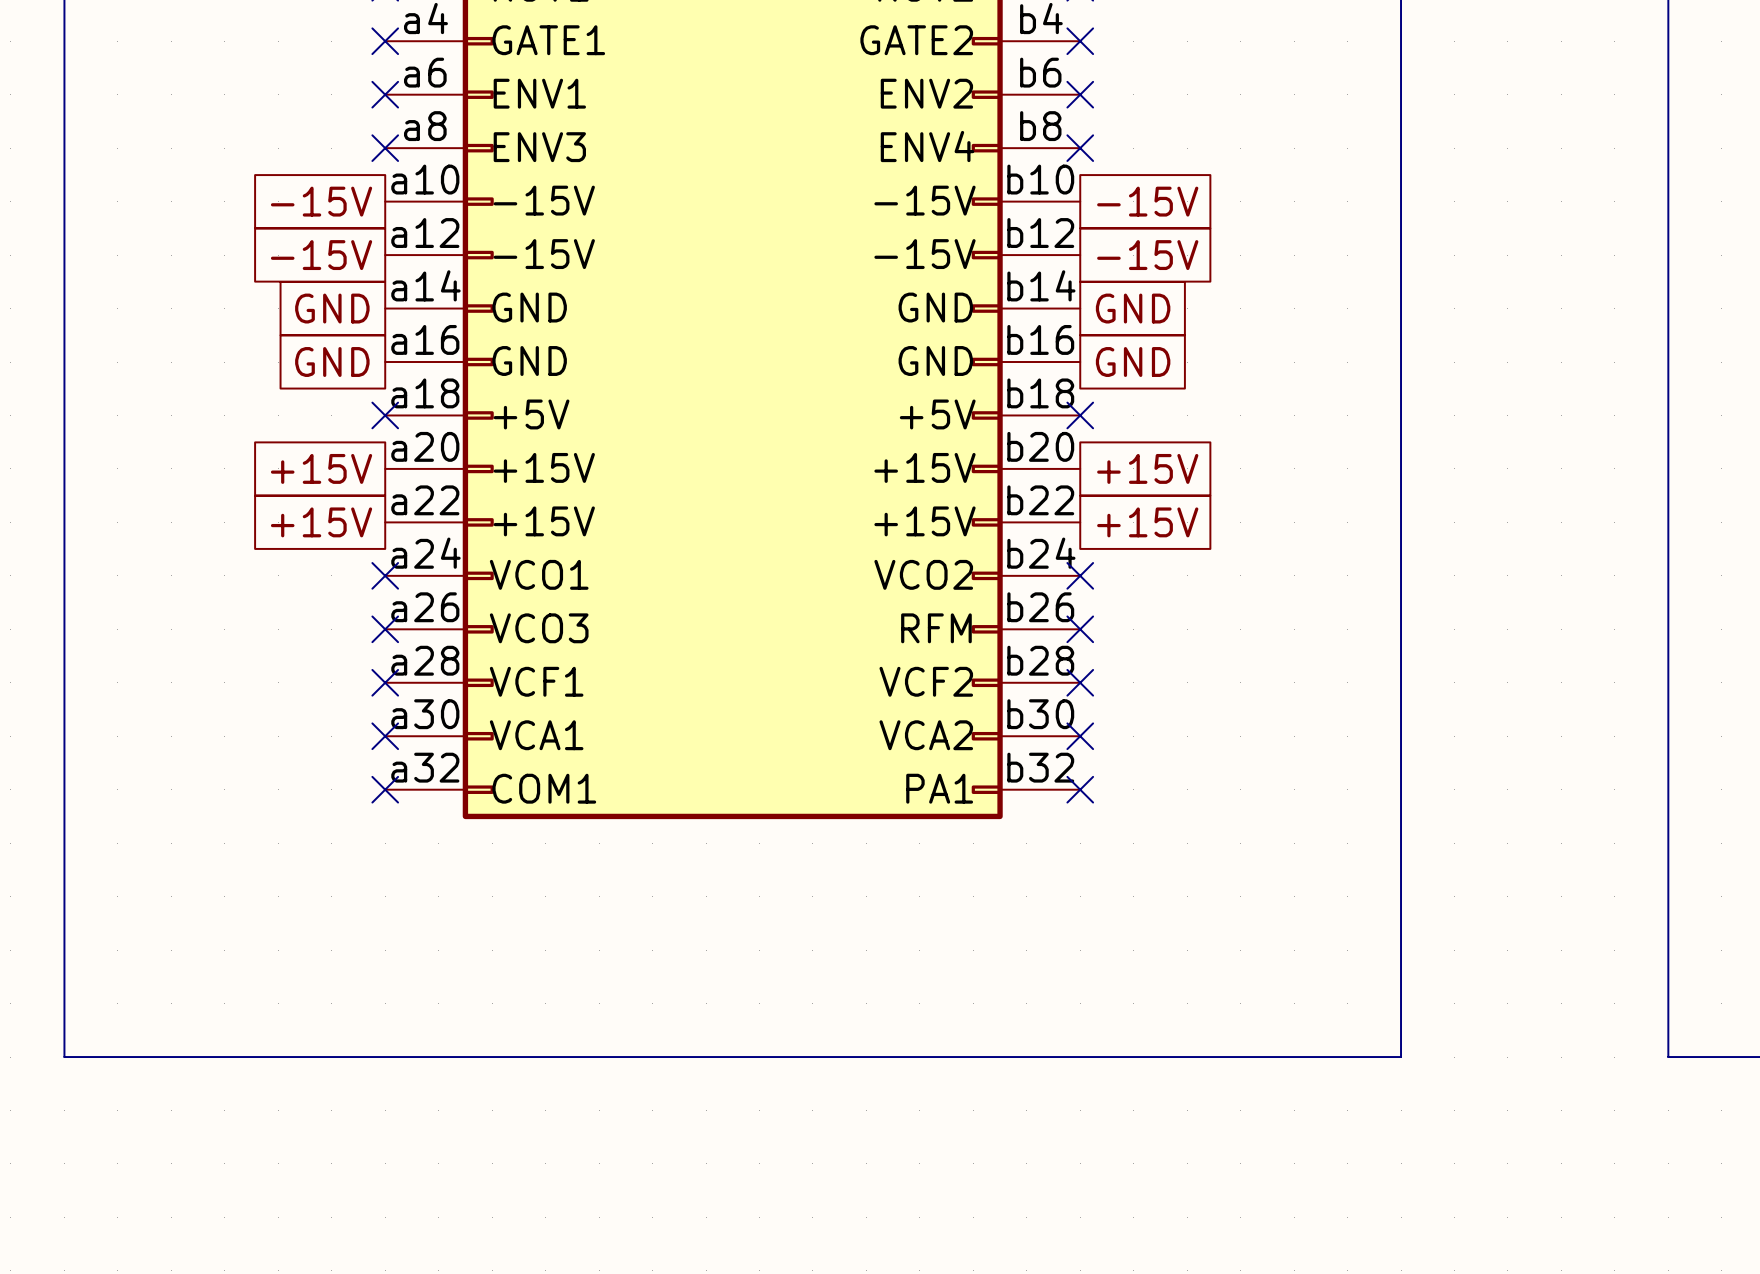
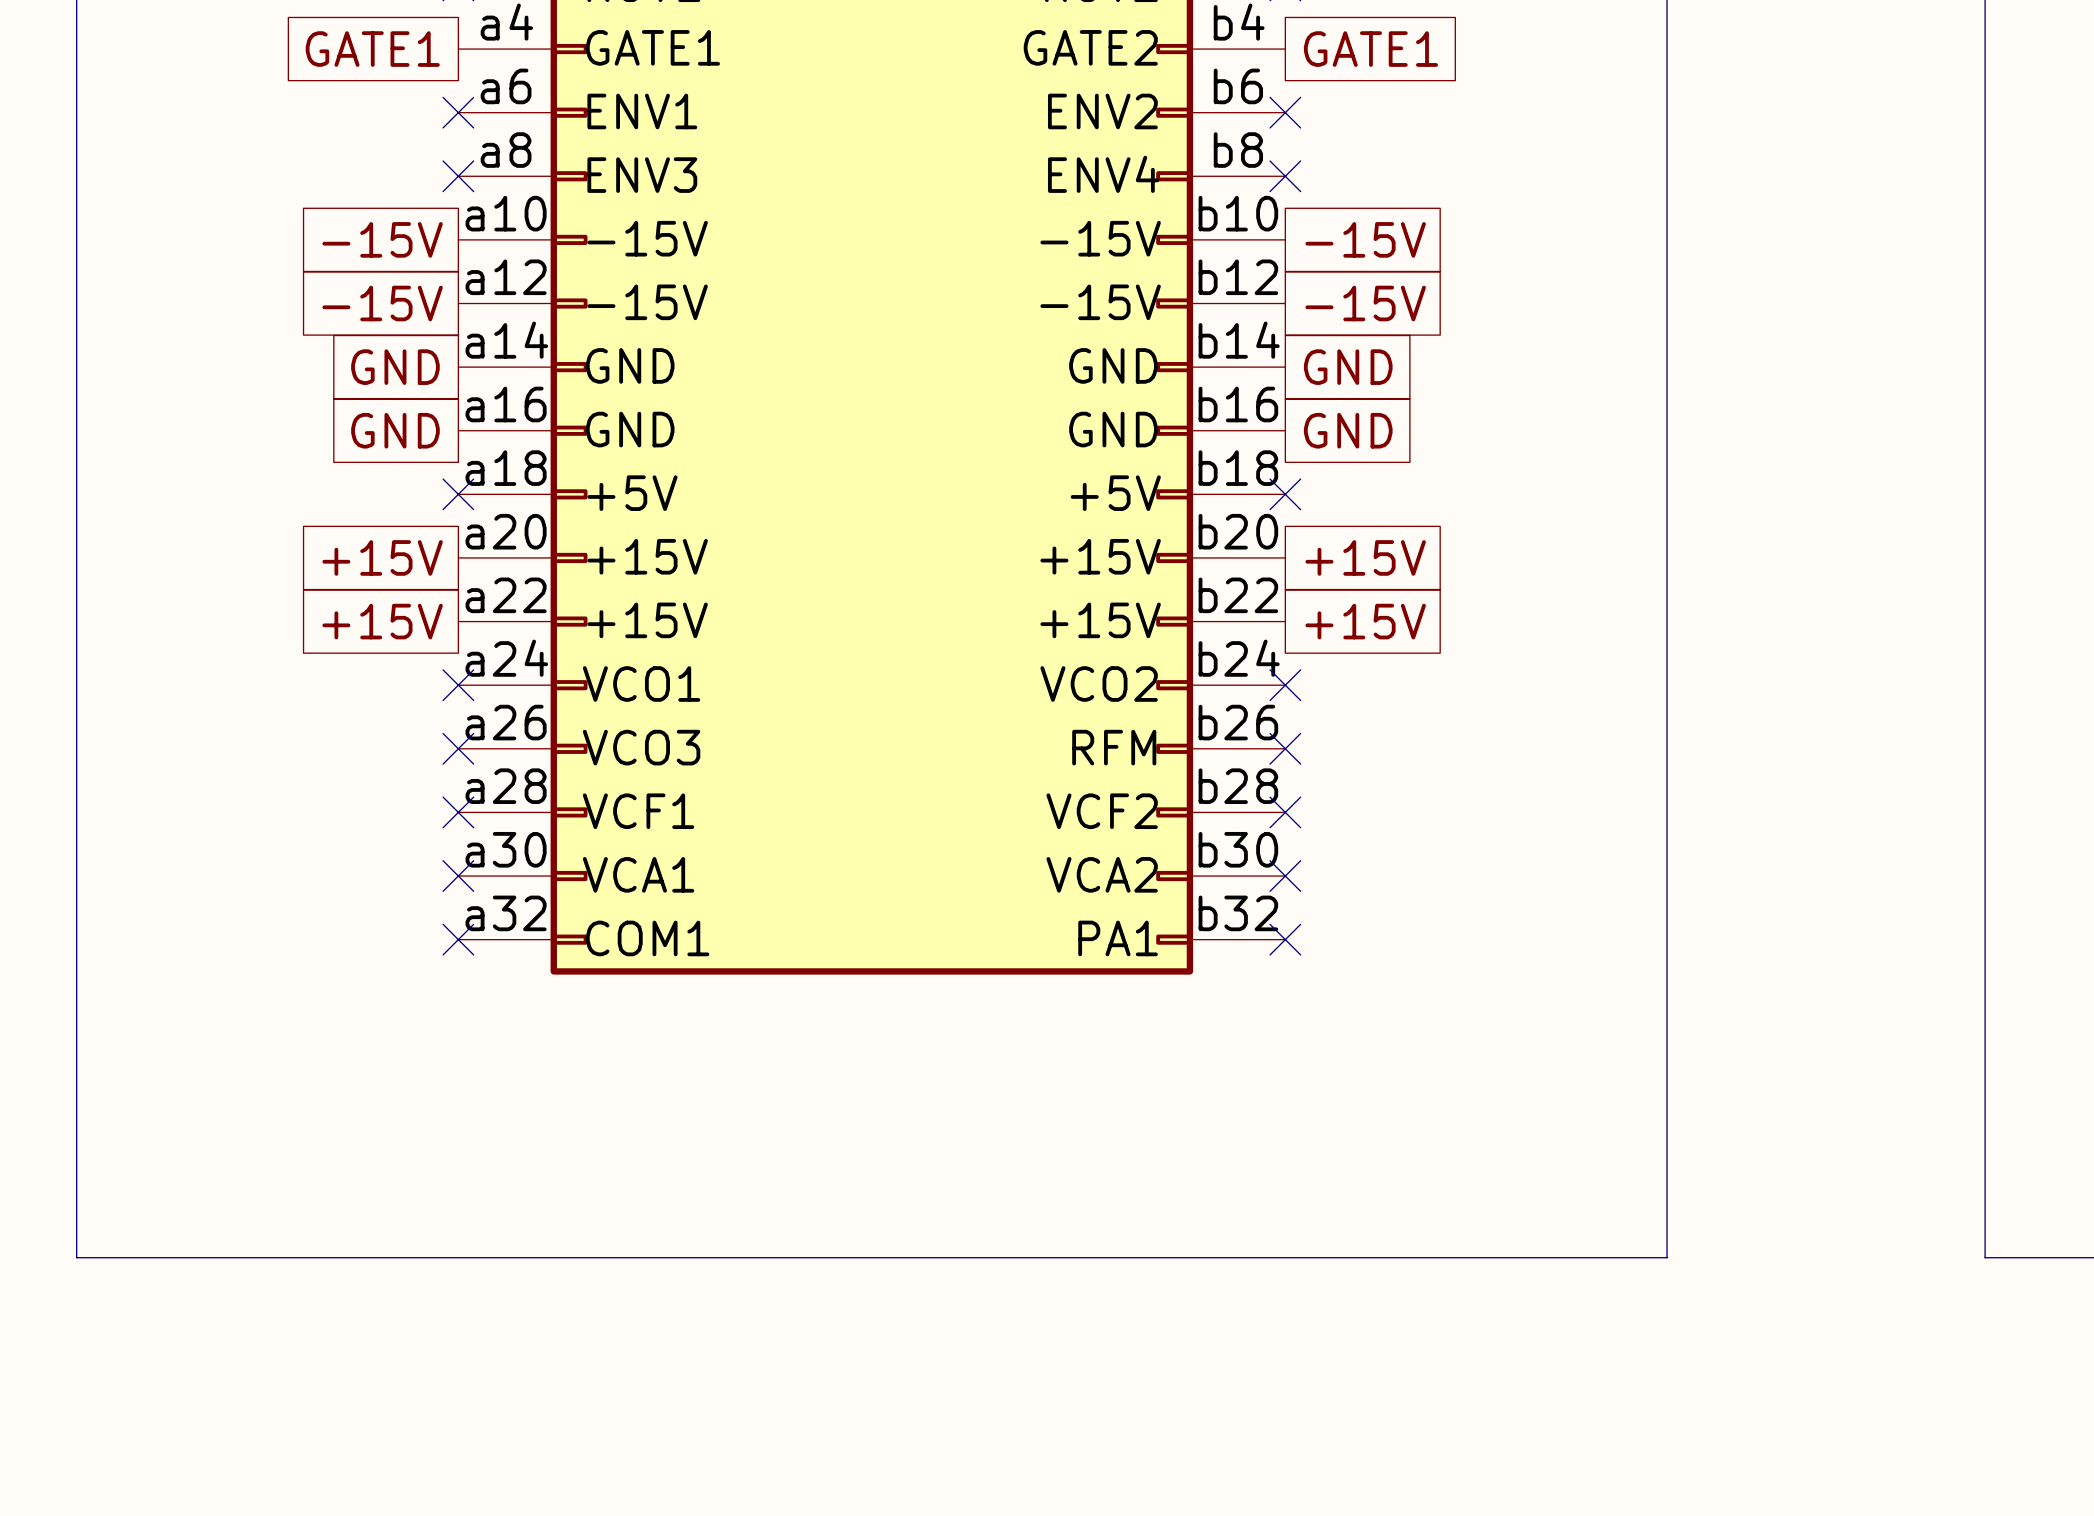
global label: none -> GATE1 (372, 49)
no-connect mark: (385, 41) -> none
no-connect mark: (1080, 41) -> none
global label: none -> GATE1 (1370, 49)

